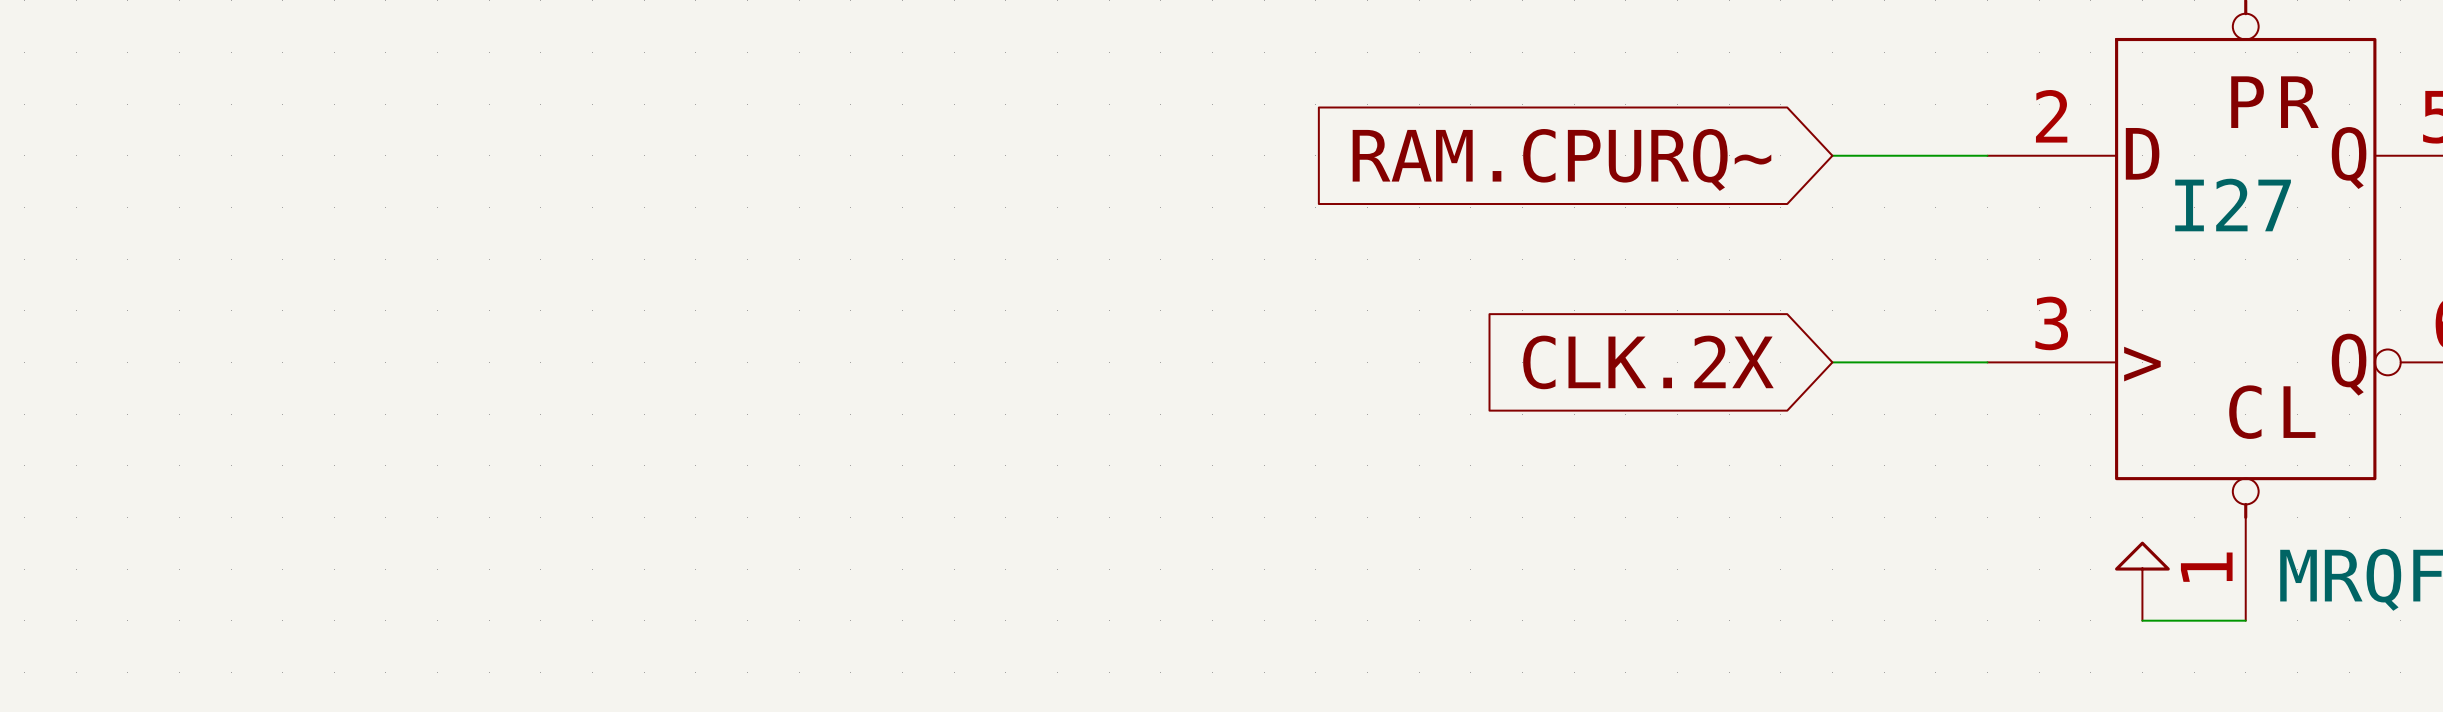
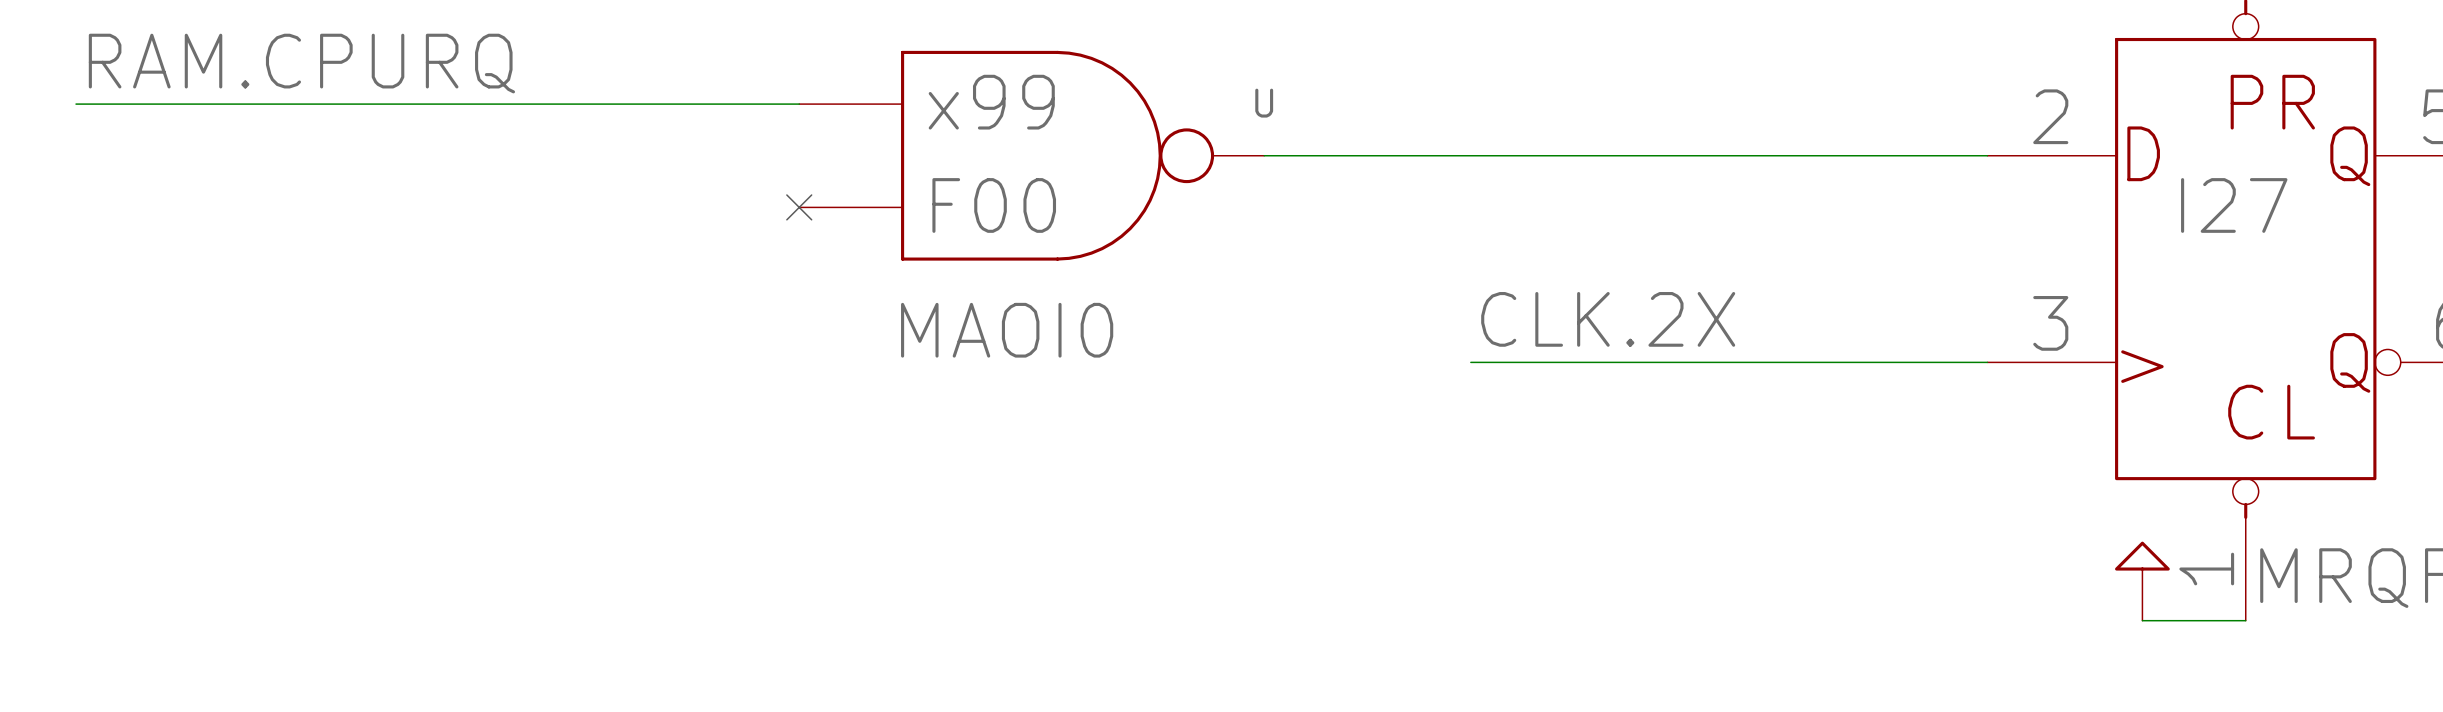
label: none -> RAM.CPURQ (301, 63)
wire: none -> (76, 104) (799, 104)
U: none -> F00 (1031, 155)
wire: none -> (1264, 155) (1832, 155)
global label: RAM.CPURQ~ (1561, 159) -> none
no-connect mark: none -> (799, 207)
label: none -> CLK.2X (1608, 319)
wire: none -> (1470, 362) (1832, 362)
global label: CLK.2X (1648, 362) -> none

